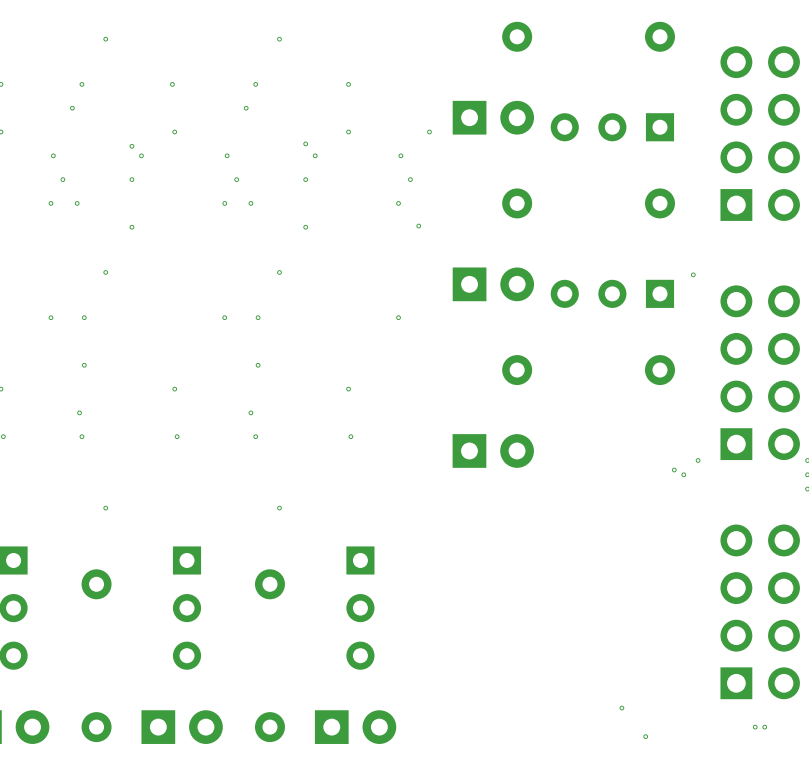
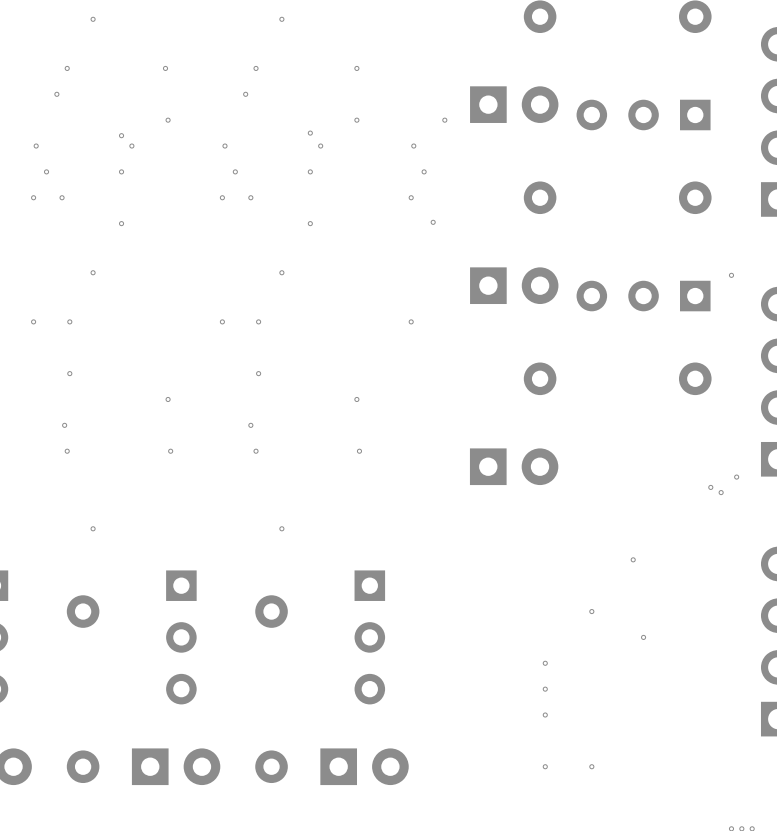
via: none -> (633, 559)
via: none -> (591, 611)
via: none -> (643, 637)
via: none -> (545, 663)
via: none -> (545, 689)
via: none -> (545, 715)
via: (621, 708) -> none
via: none -> (545, 766)
via: none -> (591, 766)
via: (645, 736) -> none

